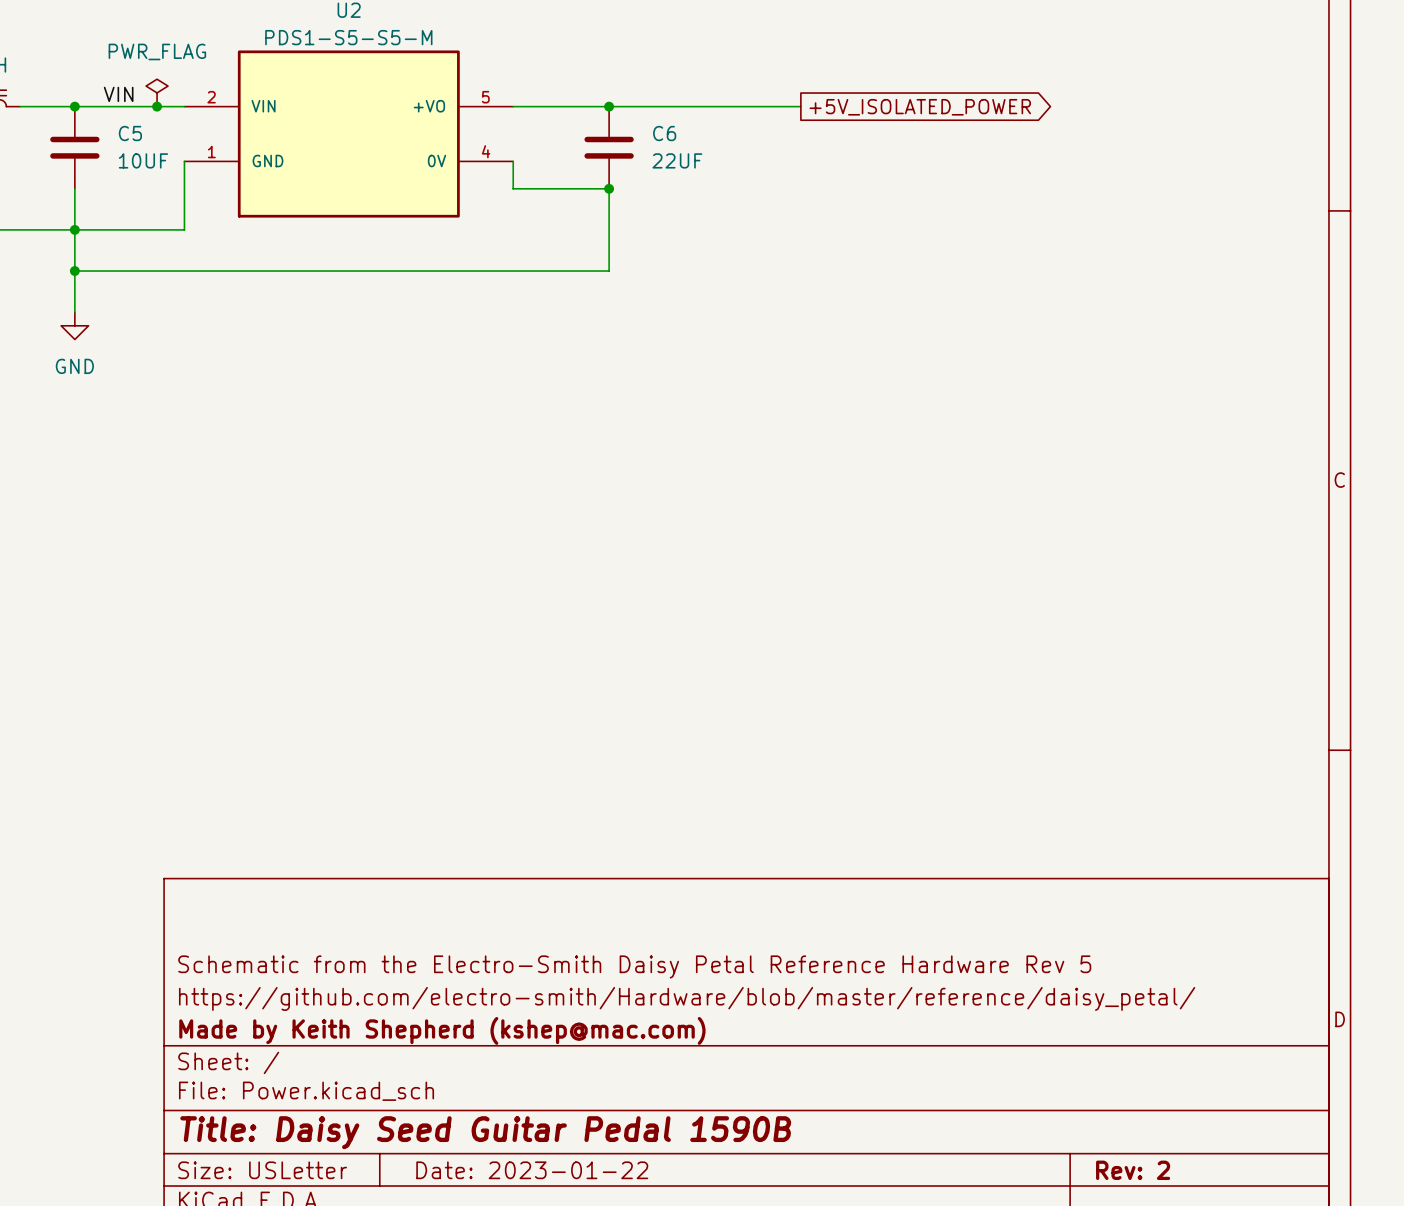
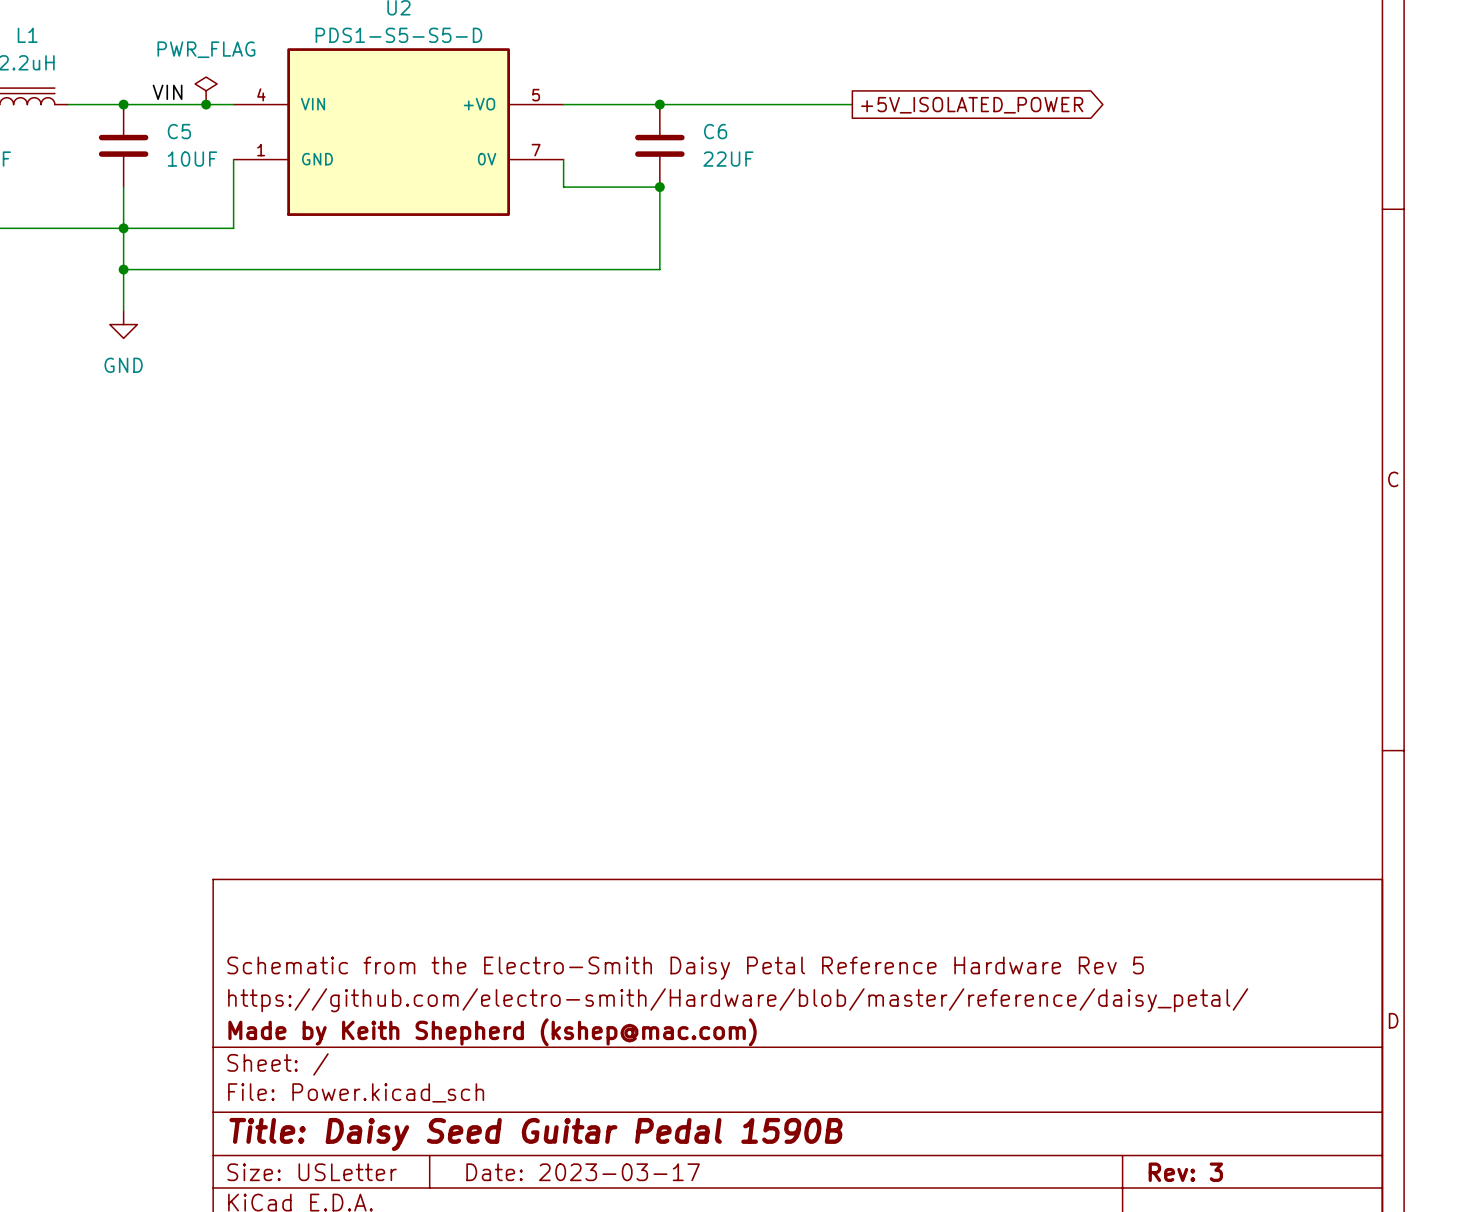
U2 value: PDS1-S5-S5-M (348, 37) -> PDS1-S5-S5-D (398, 35)
U2 pin number: 2 (211, 97) -> 4 (261, 94)
U2 pin number: 4 (486, 151) -> 7 (536, 150)
title block: Date: 2023-01-22 (532, 1170) -> Date: 2023-03-17 (583, 1172)
title block: Rev: 2 (1133, 1170) -> Rev: 3 (1185, 1172)

